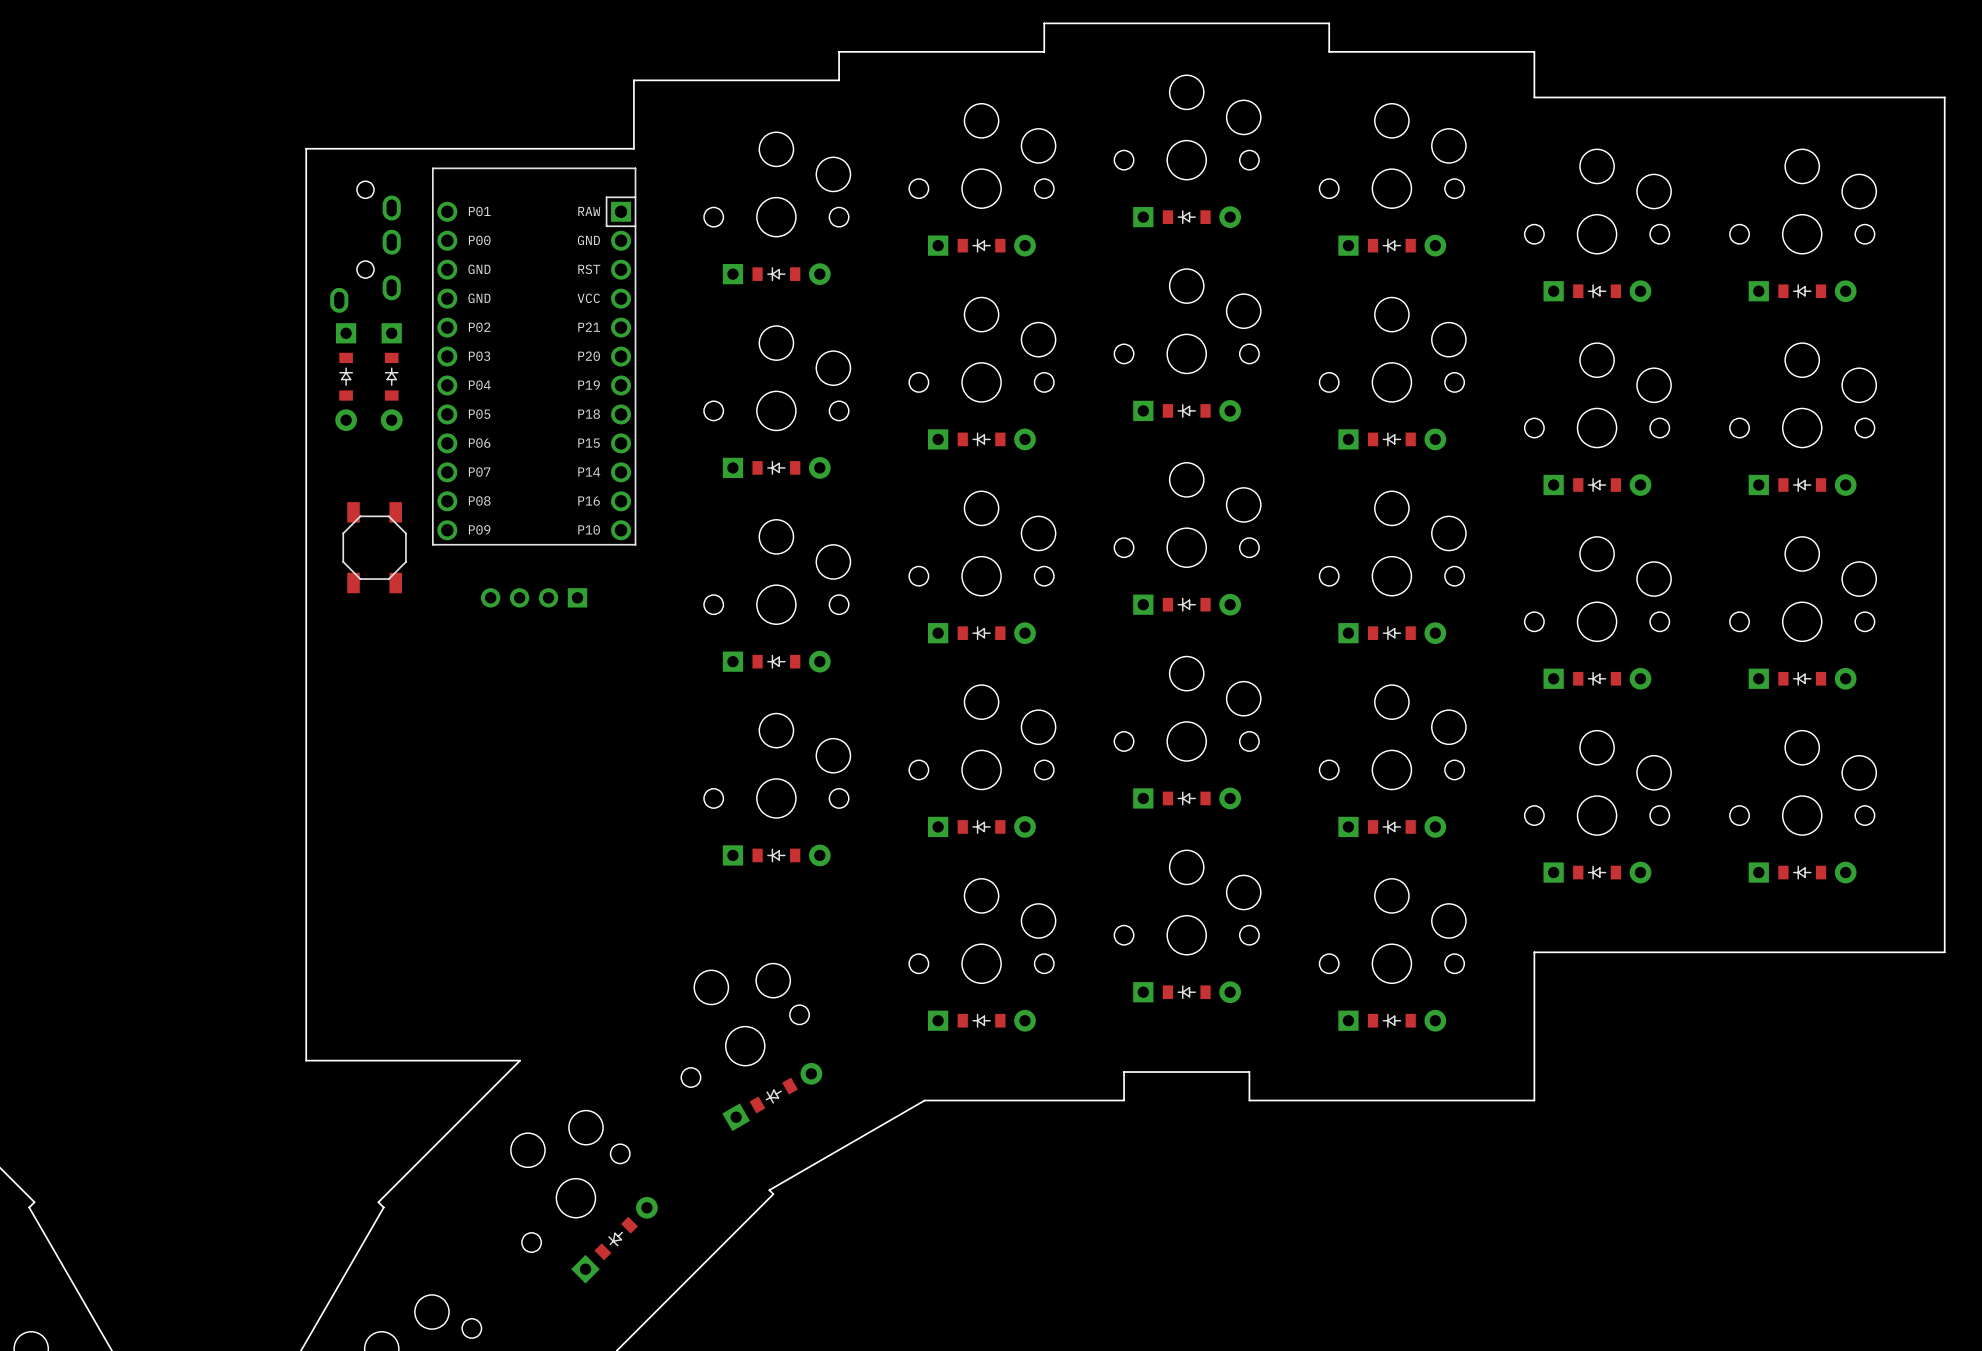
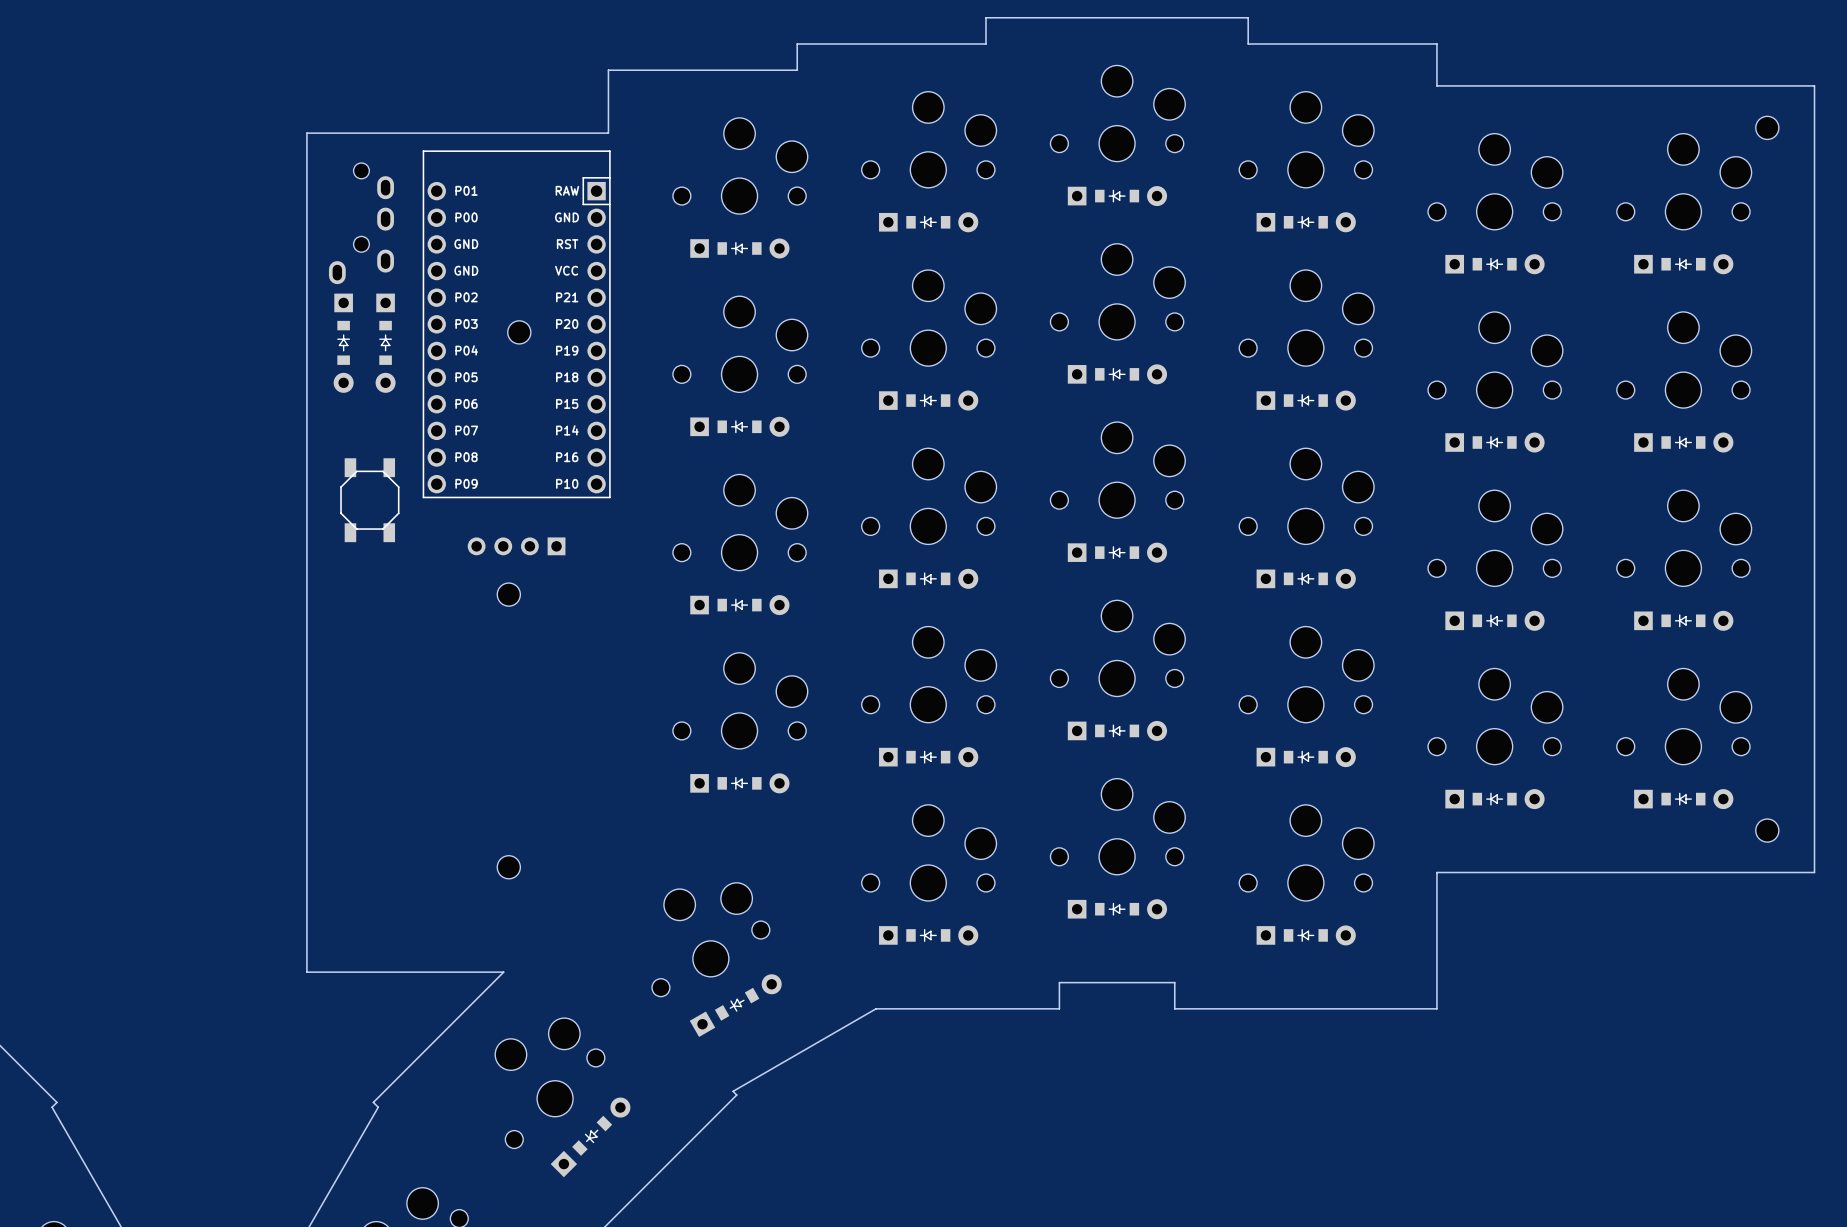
part: none -> (1767, 127)
part: none -> (519, 332)
part: none -> (508, 594)
part: none -> (1767, 830)
part: none -> (508, 867)

